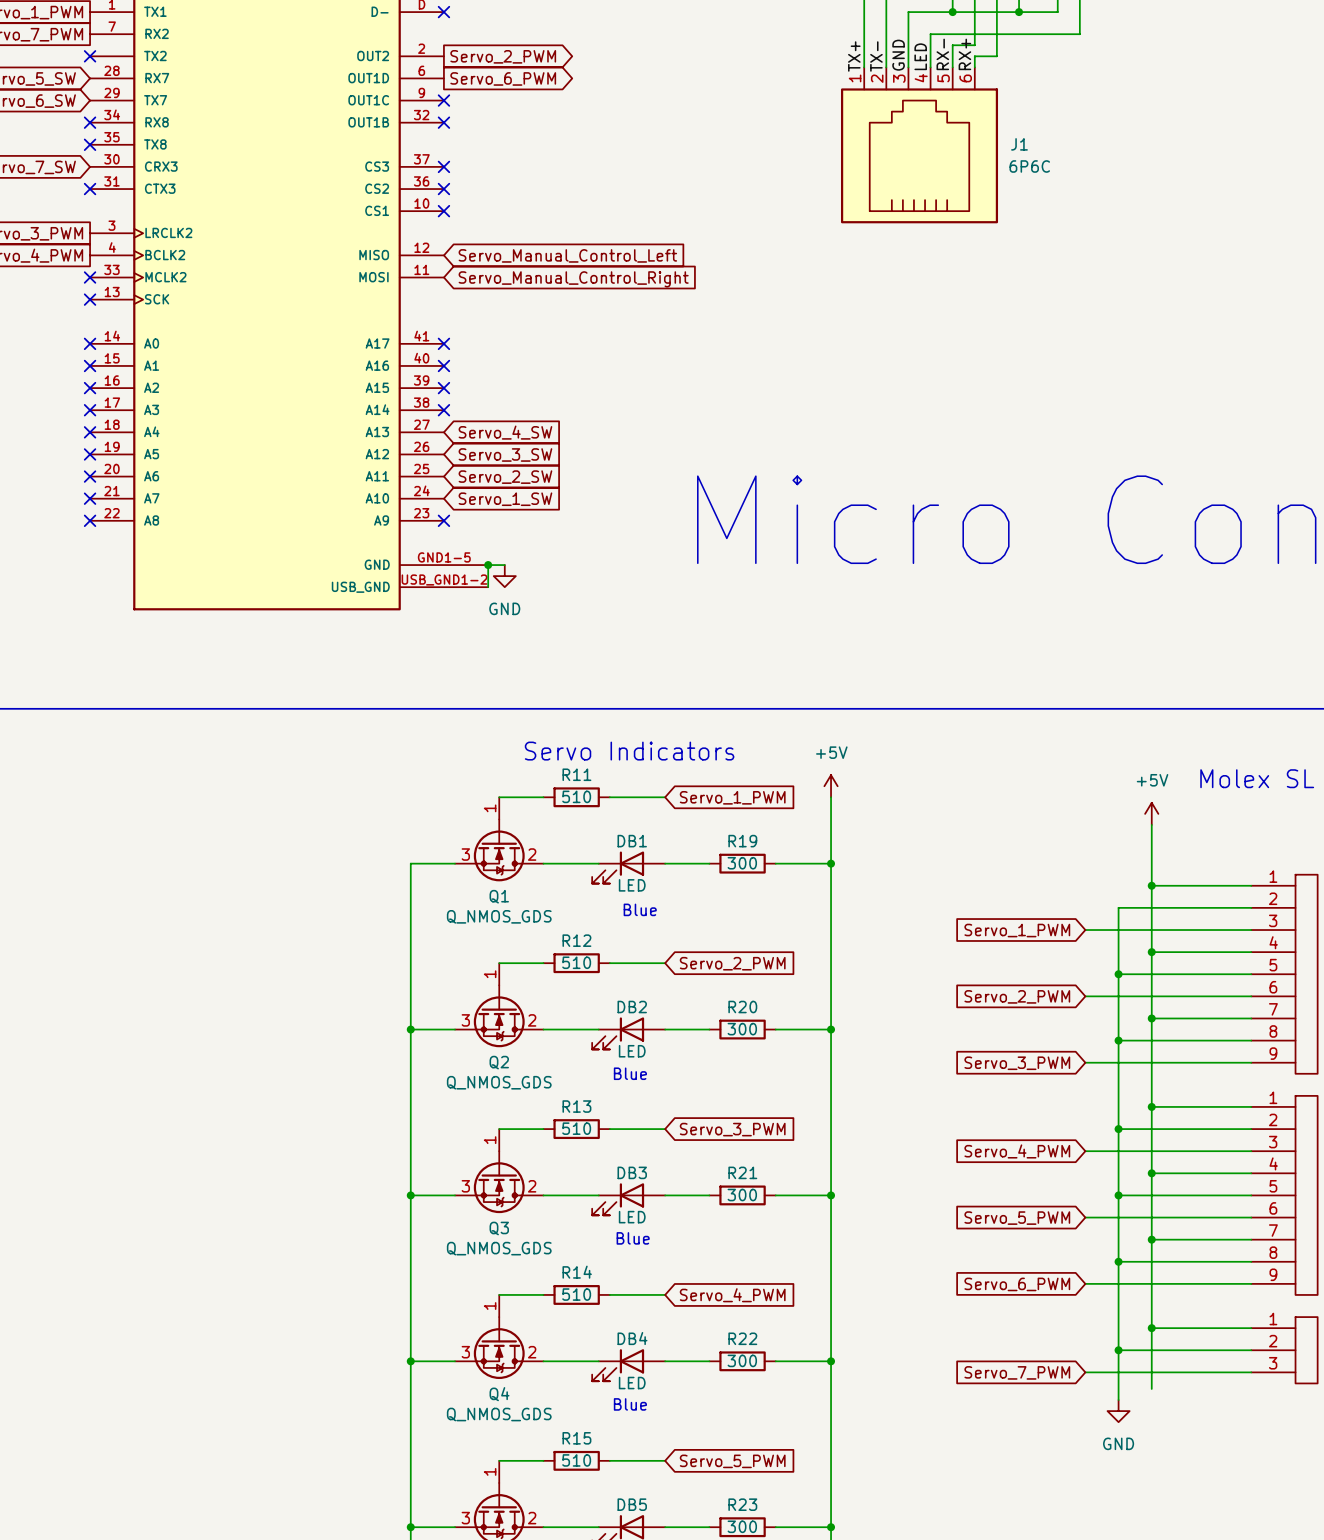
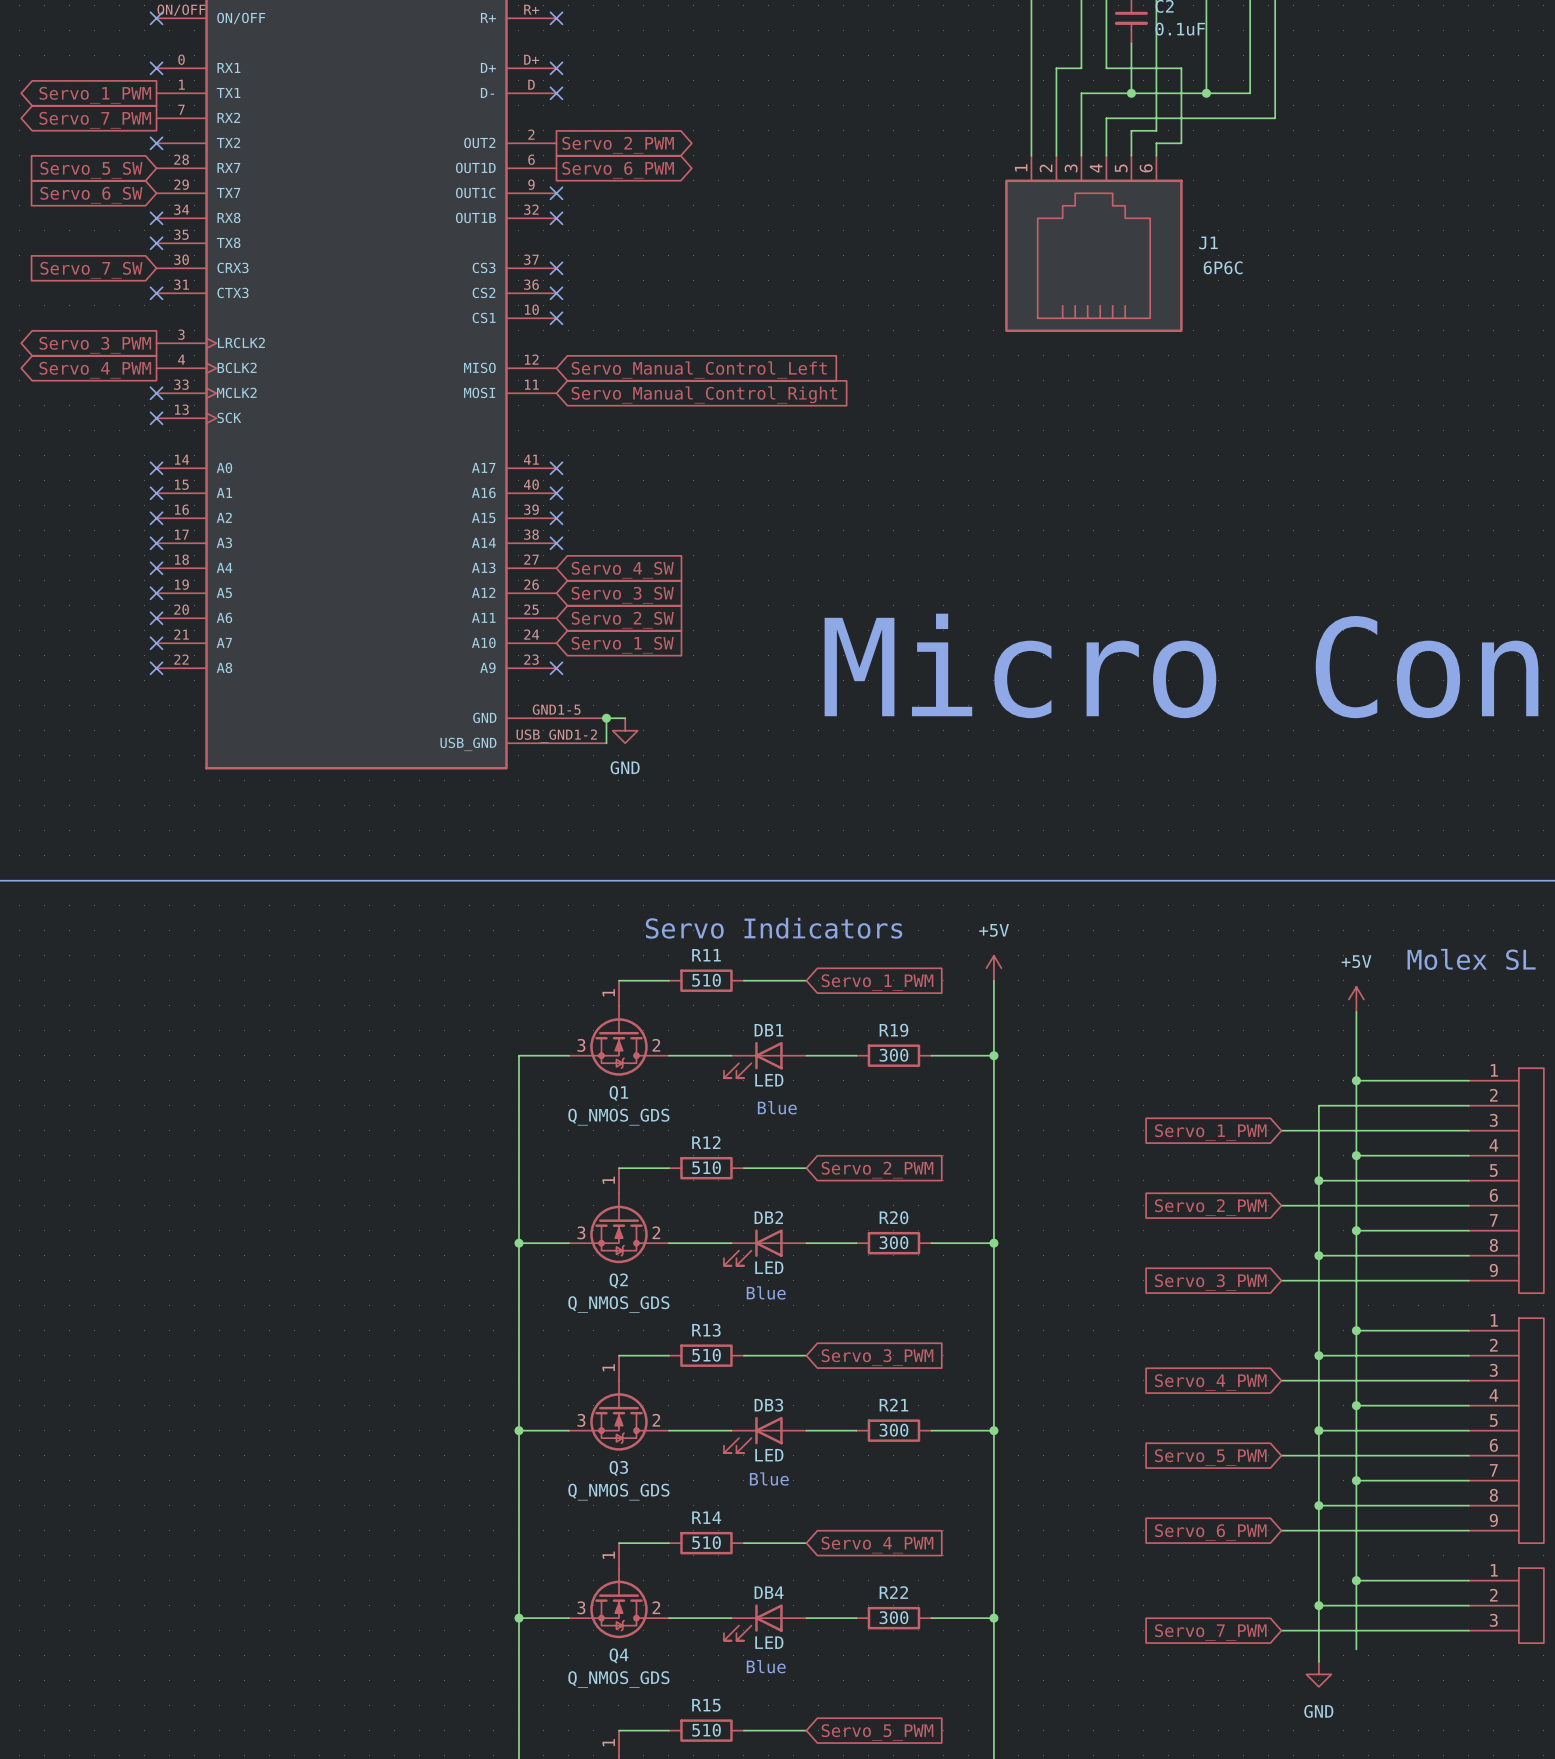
label: RX- (942, 54) -> none
label: RX+ (964, 54) -> none
label: GND (898, 55) -> none
label: TX+ (854, 56) -> none
label: TX- (876, 56) -> none
label: LED (920, 56) -> none

